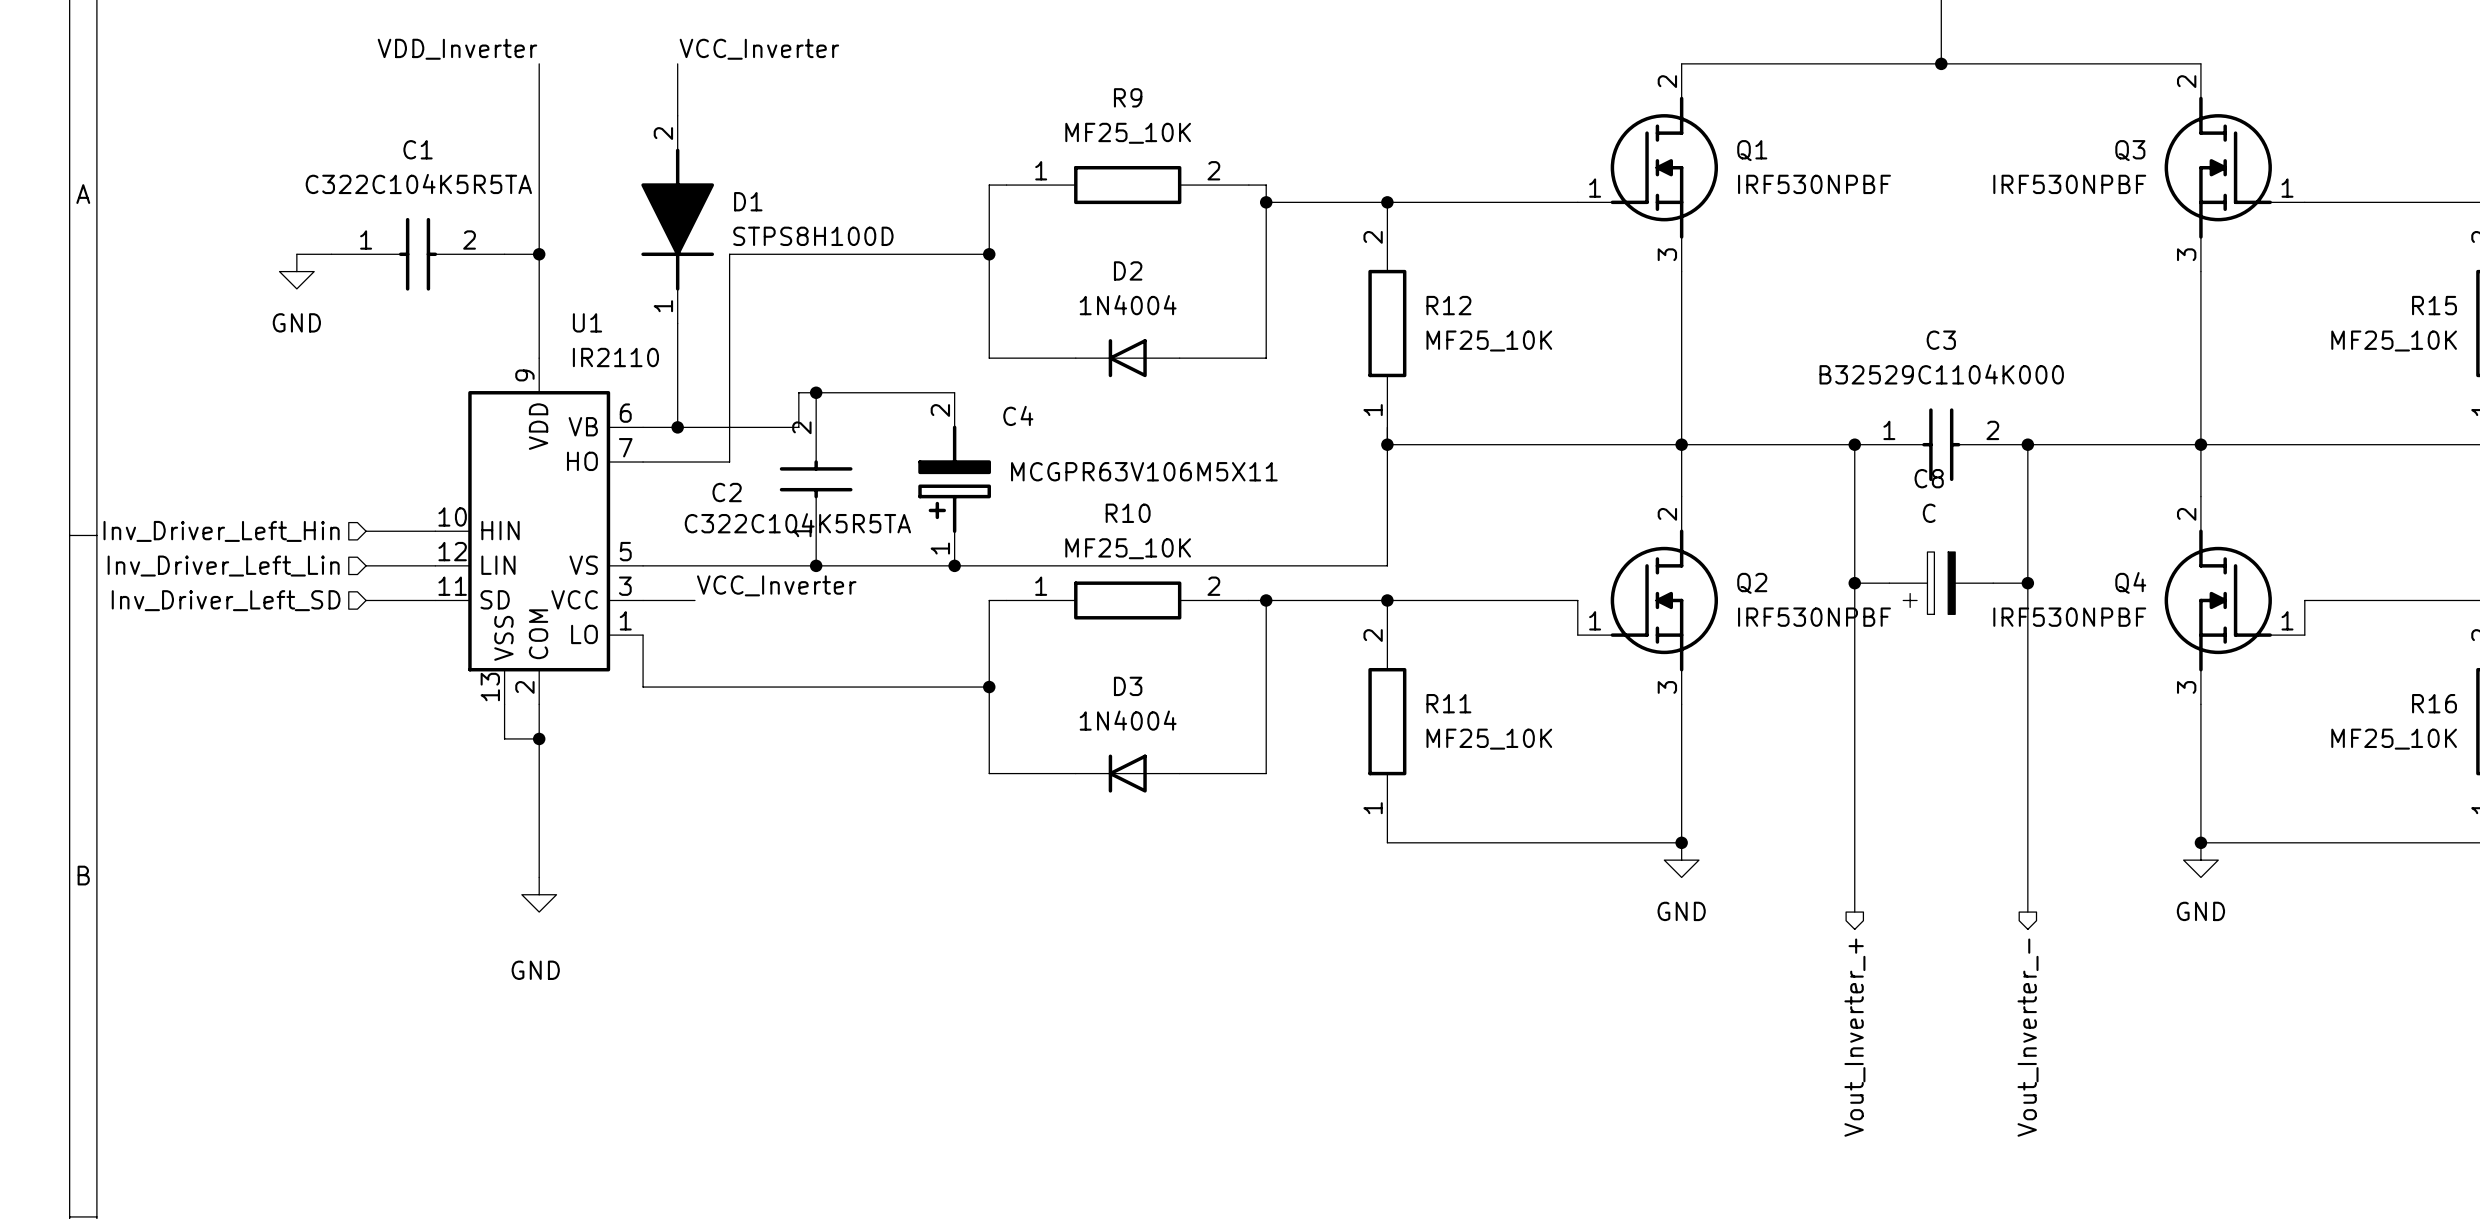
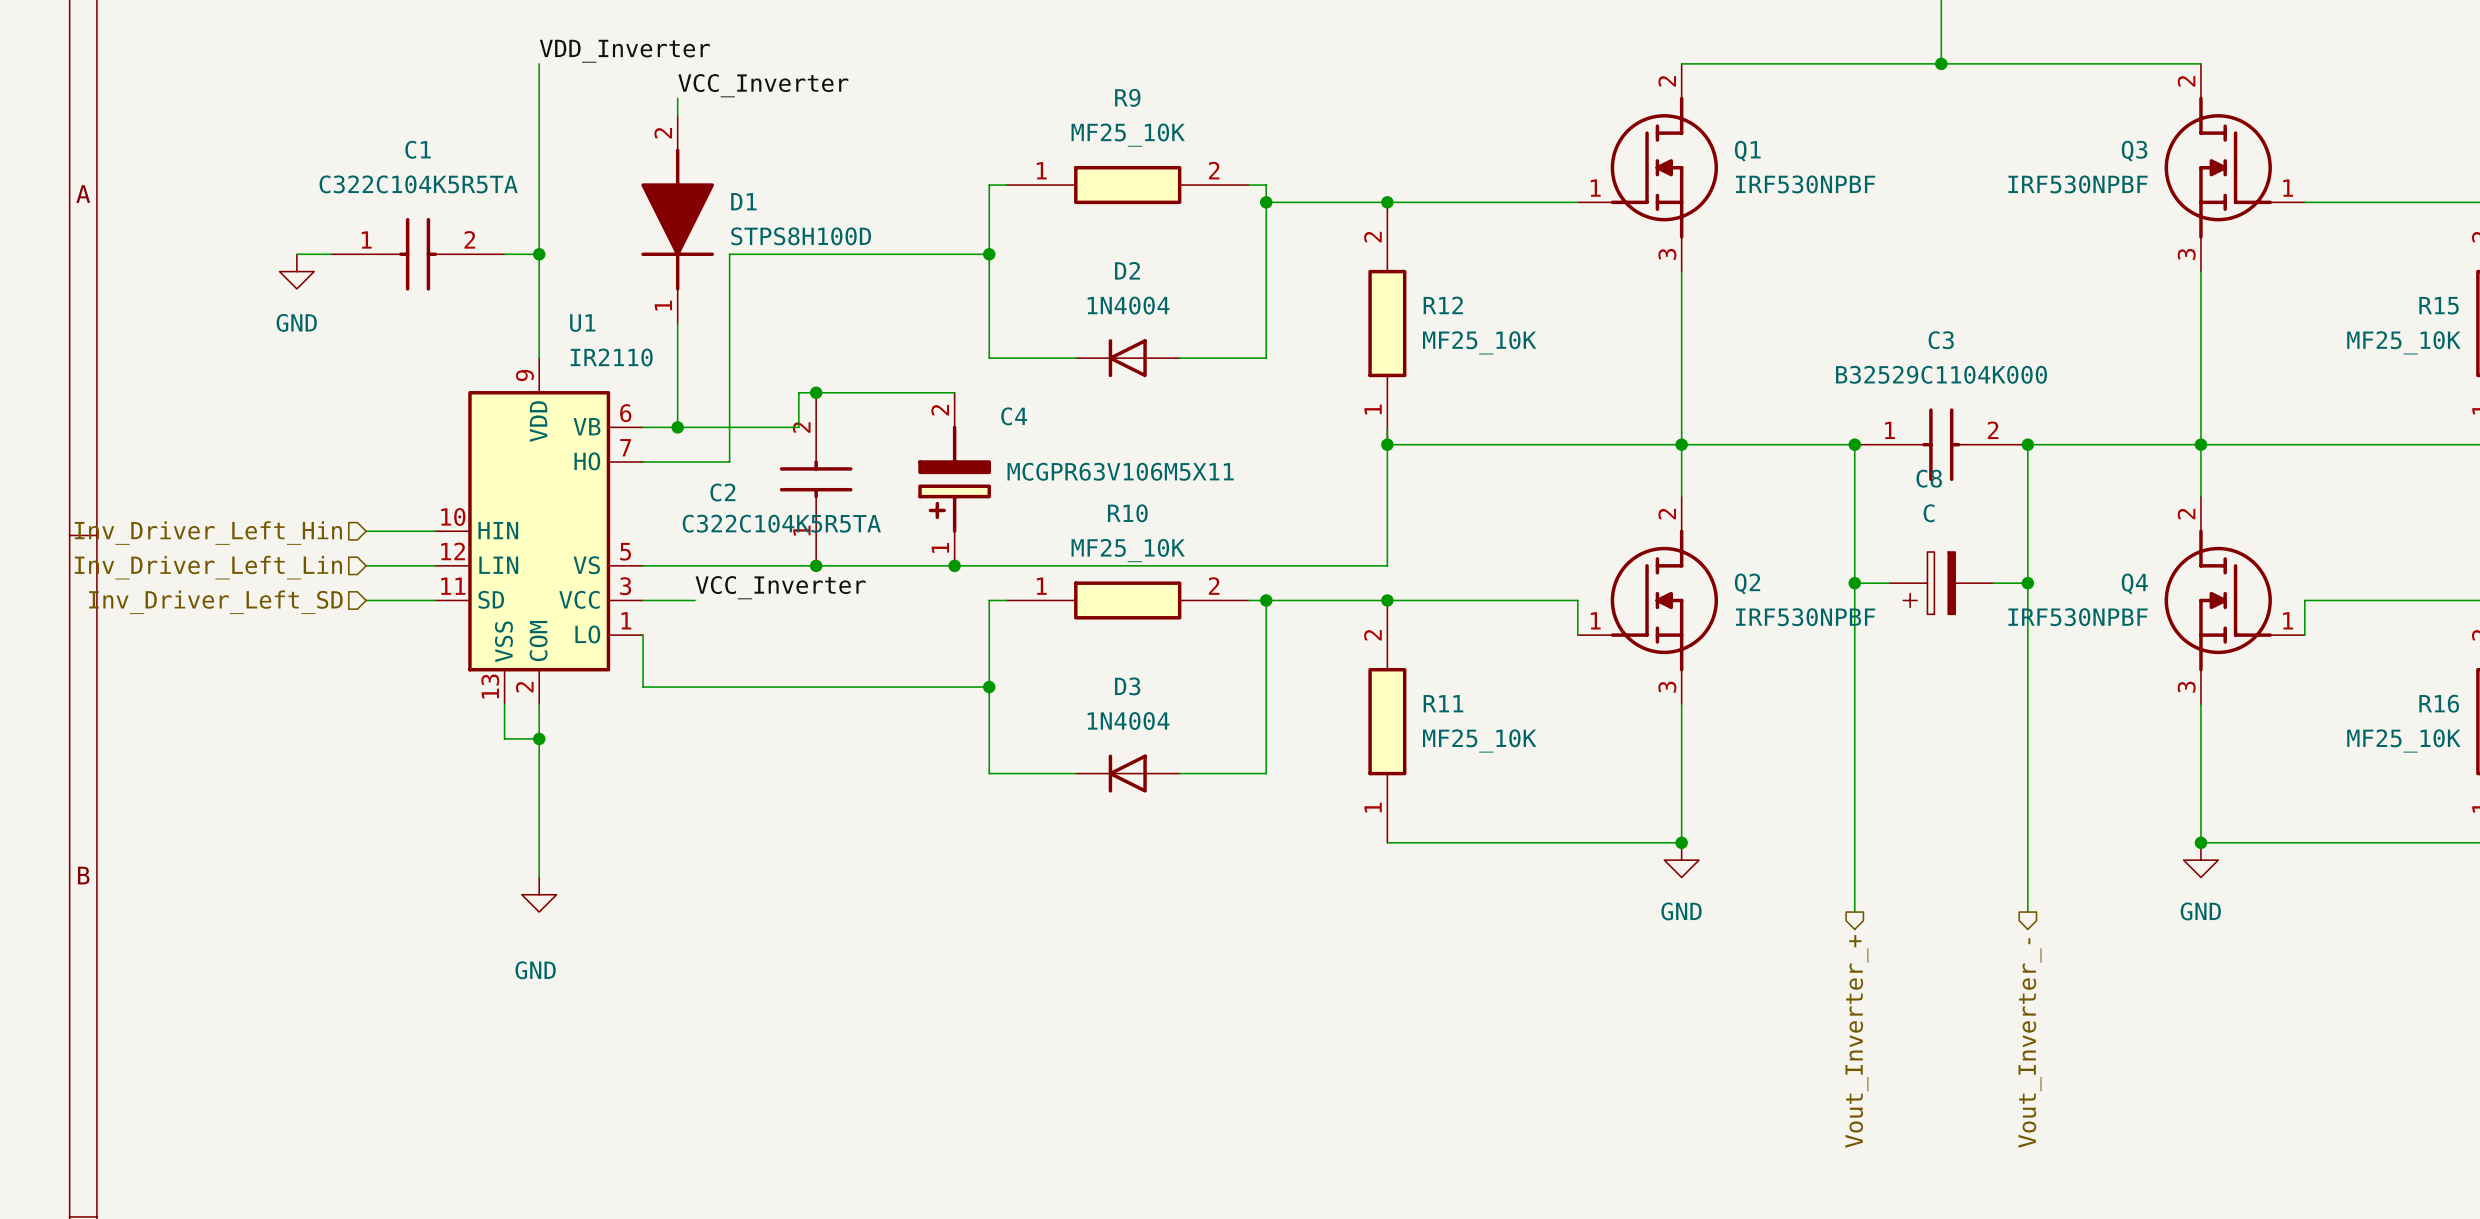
label position: VDD_Inverter (457, 49) -> VDD_Inverter (624, 51)
label position: VCC_Inverter (759, 49) -> VCC_Inverter (763, 85)
wire: (677, 63) (677, 98) -> none

